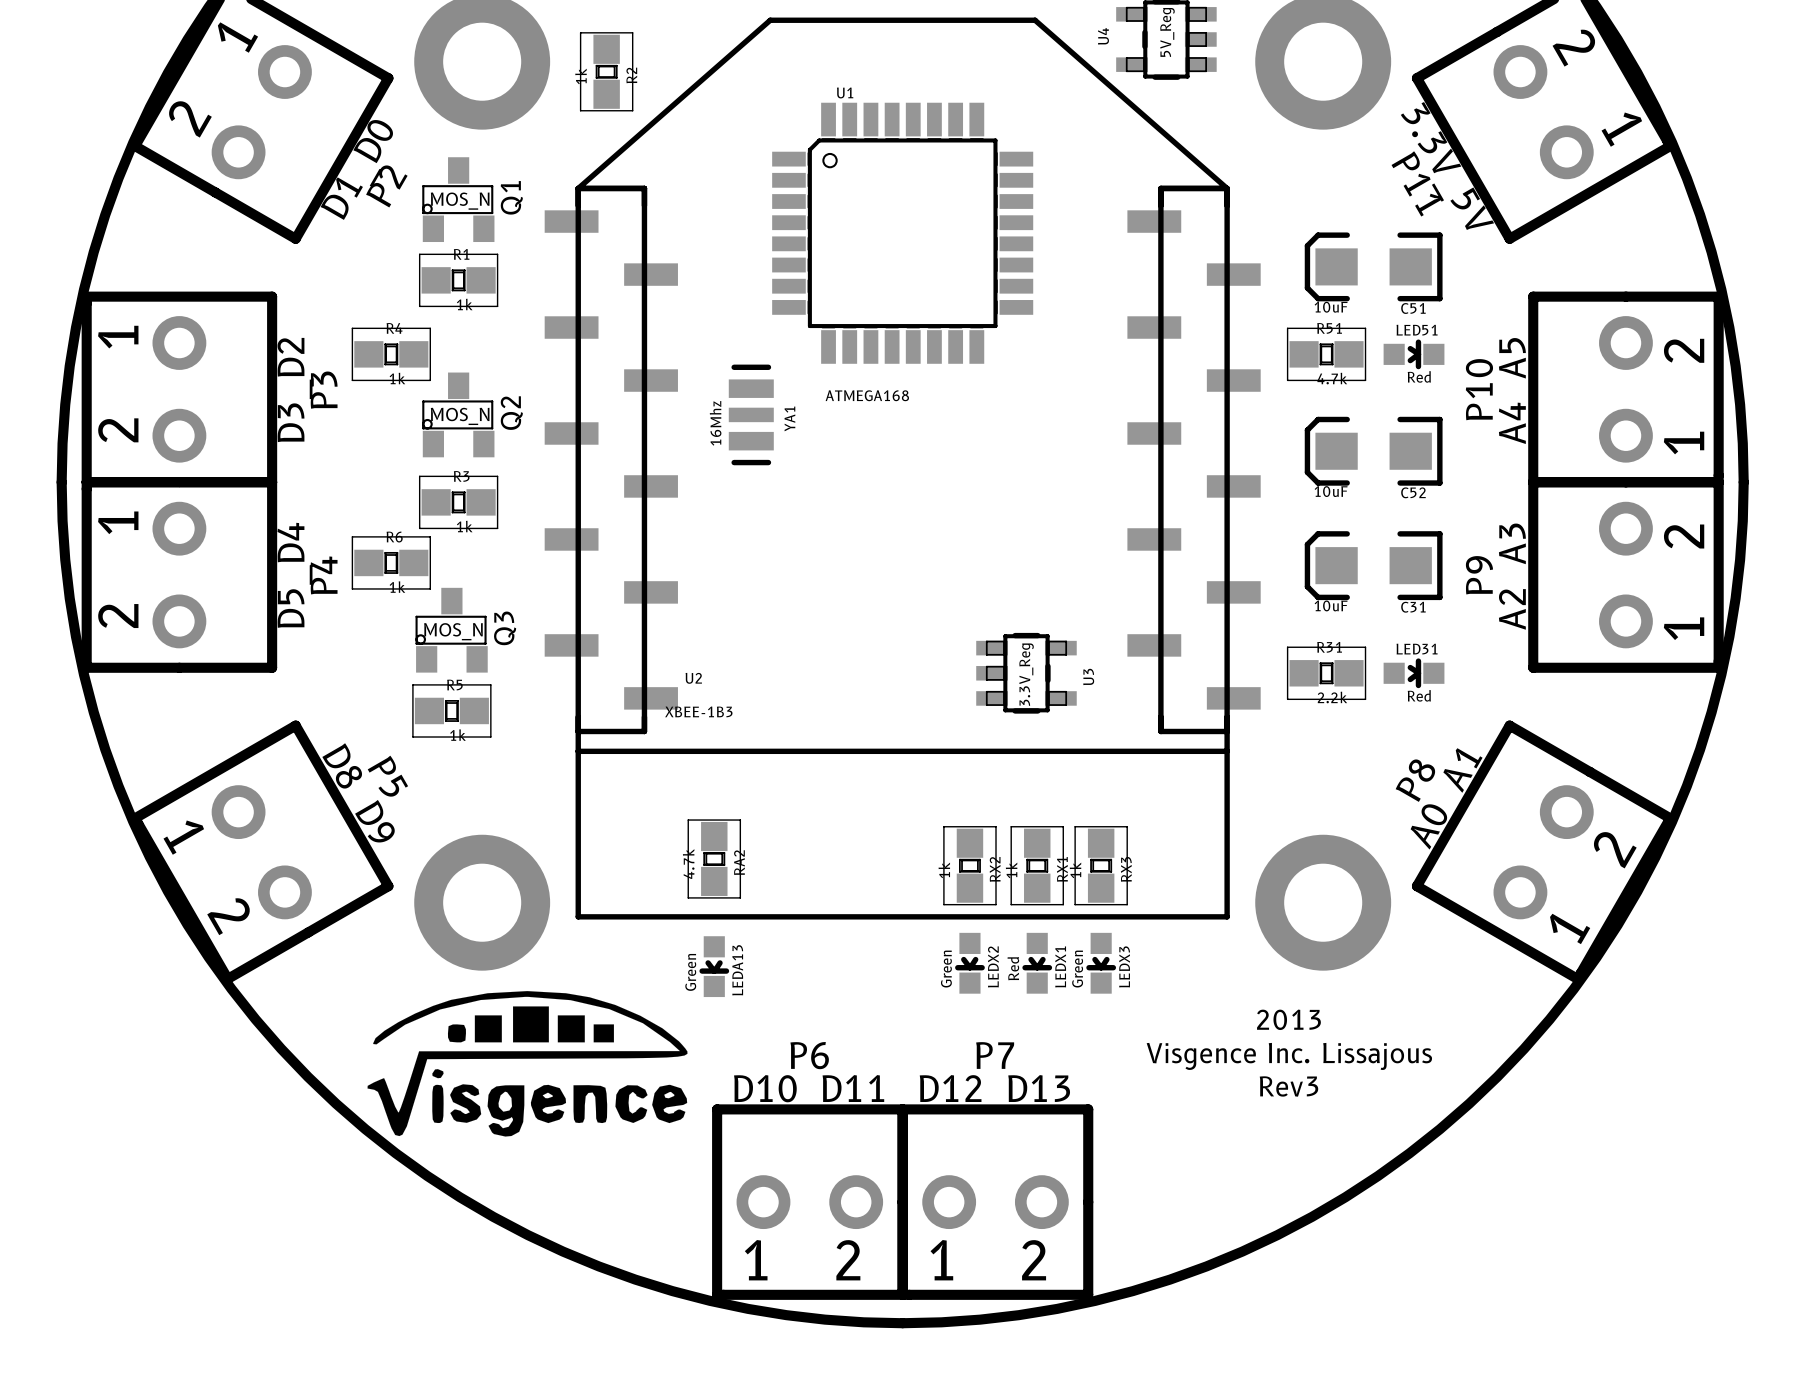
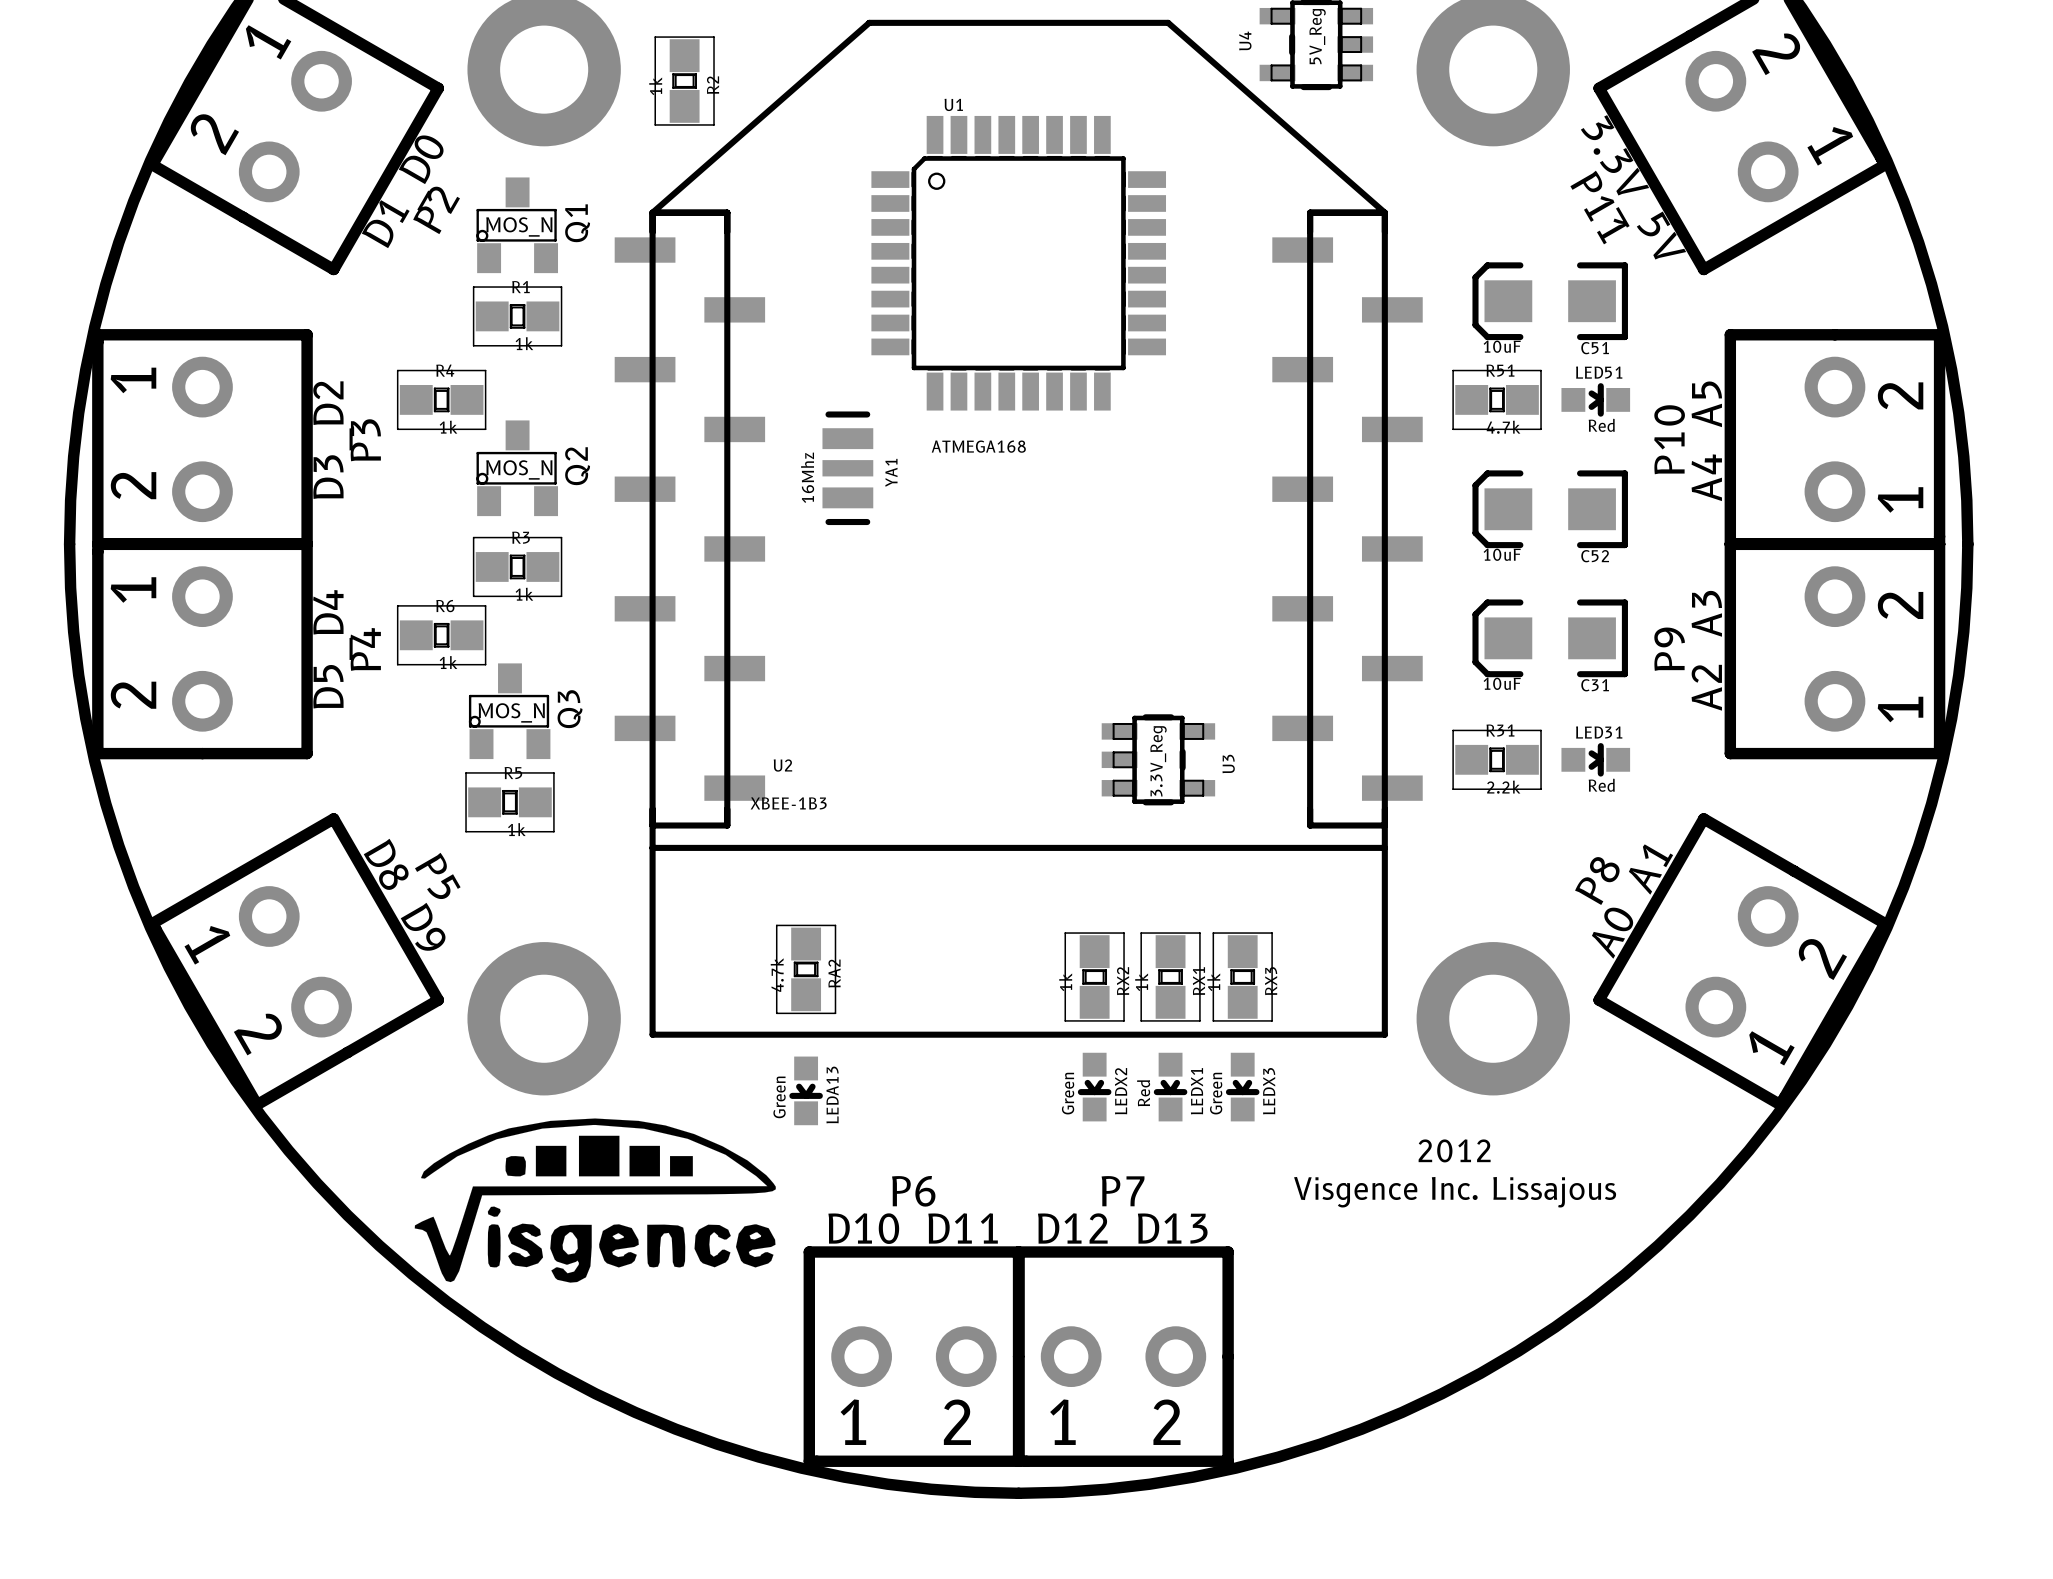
text: 2013 (1288, 1019) -> 2012 (1454, 1150)
text: Rev3 (1288, 1086) -> none

